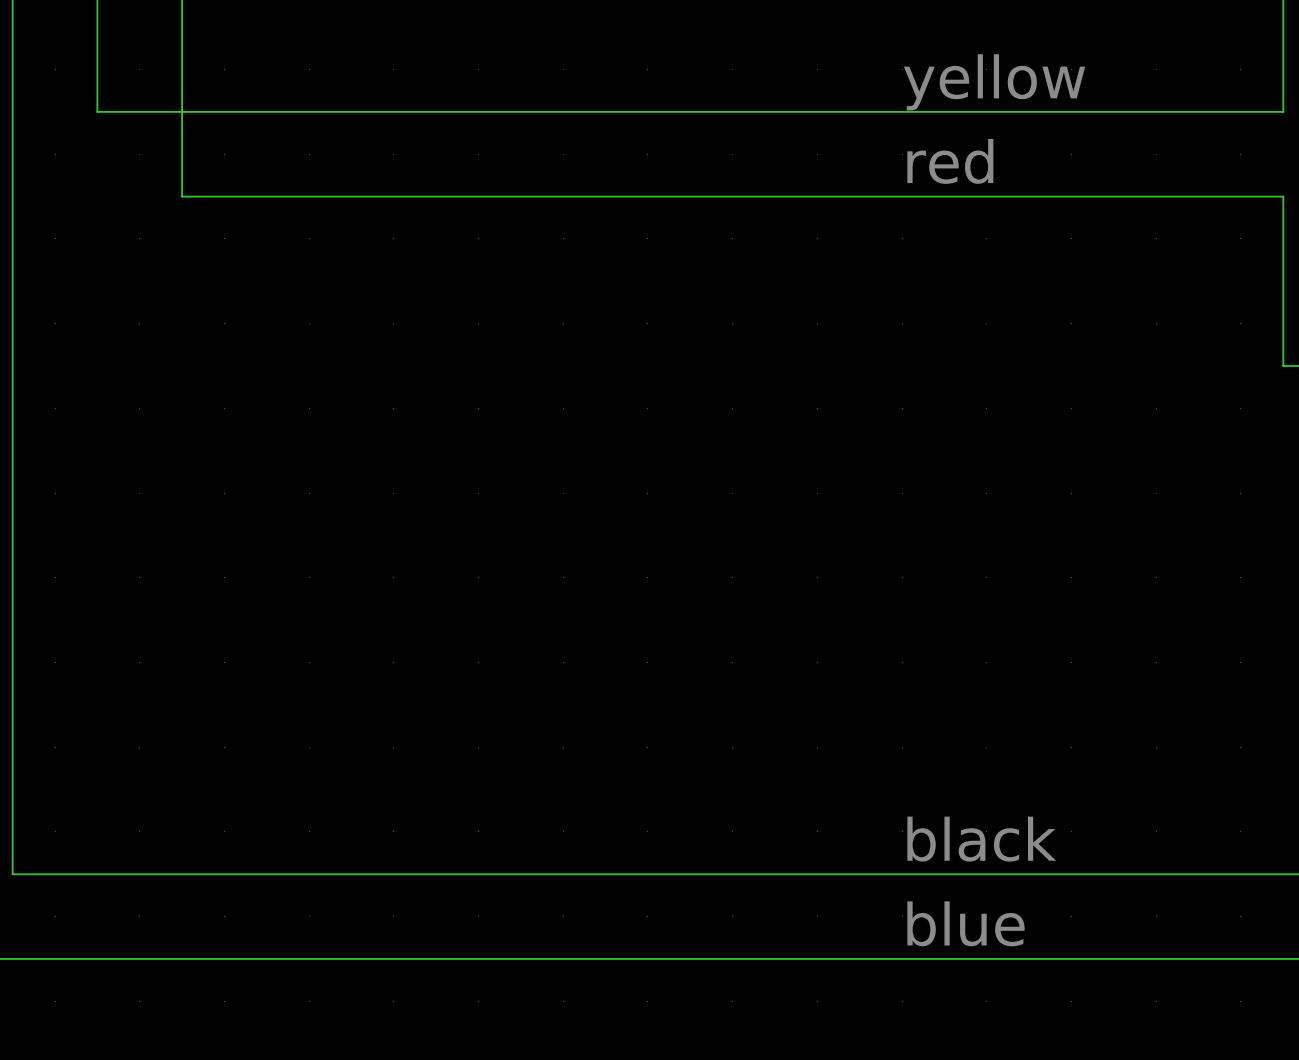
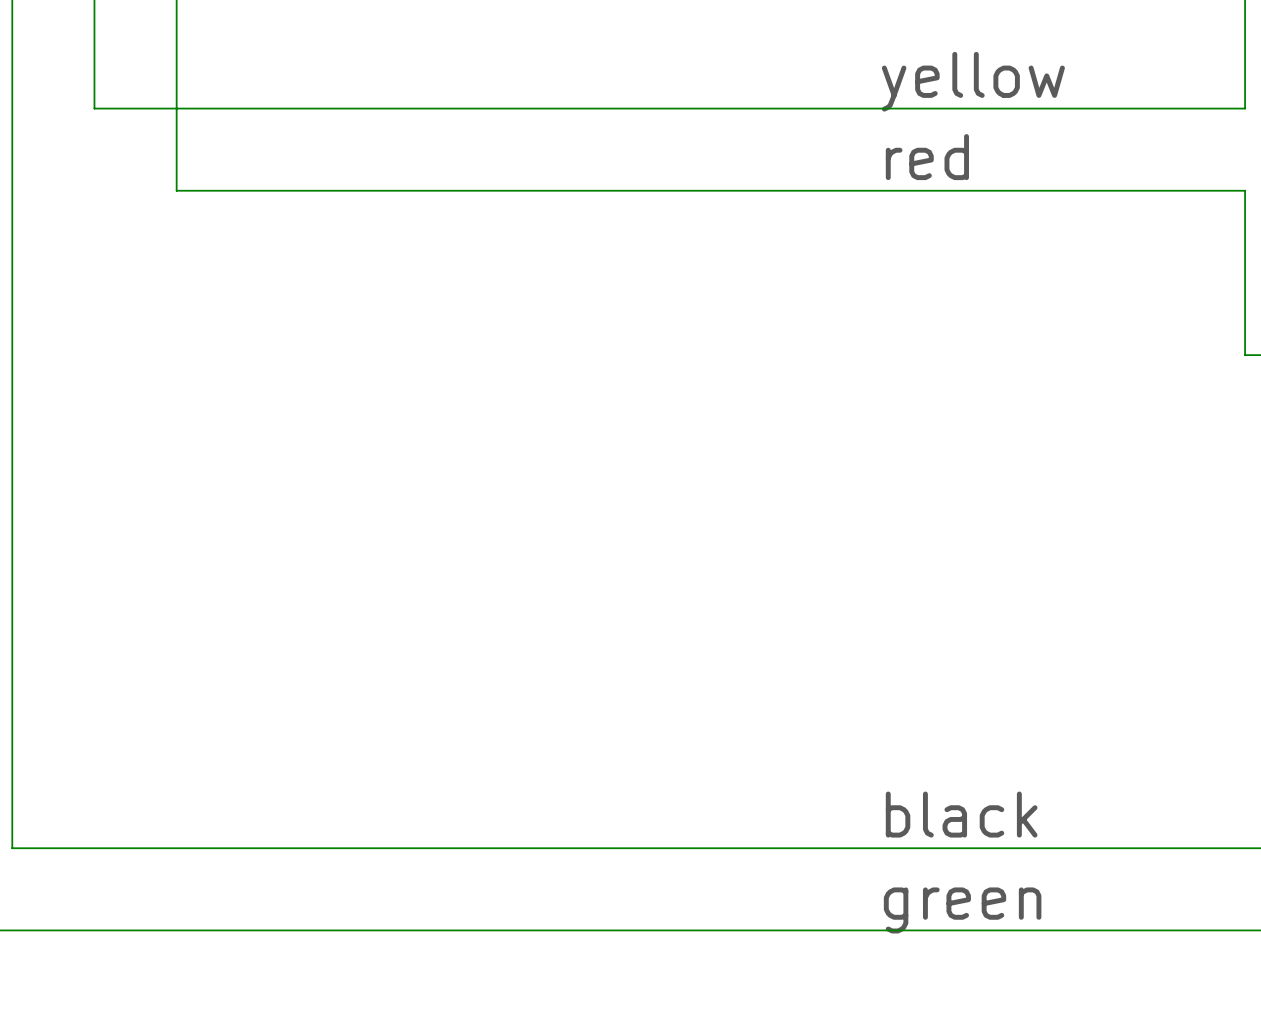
text: blue (965, 923) -> green (962, 910)

